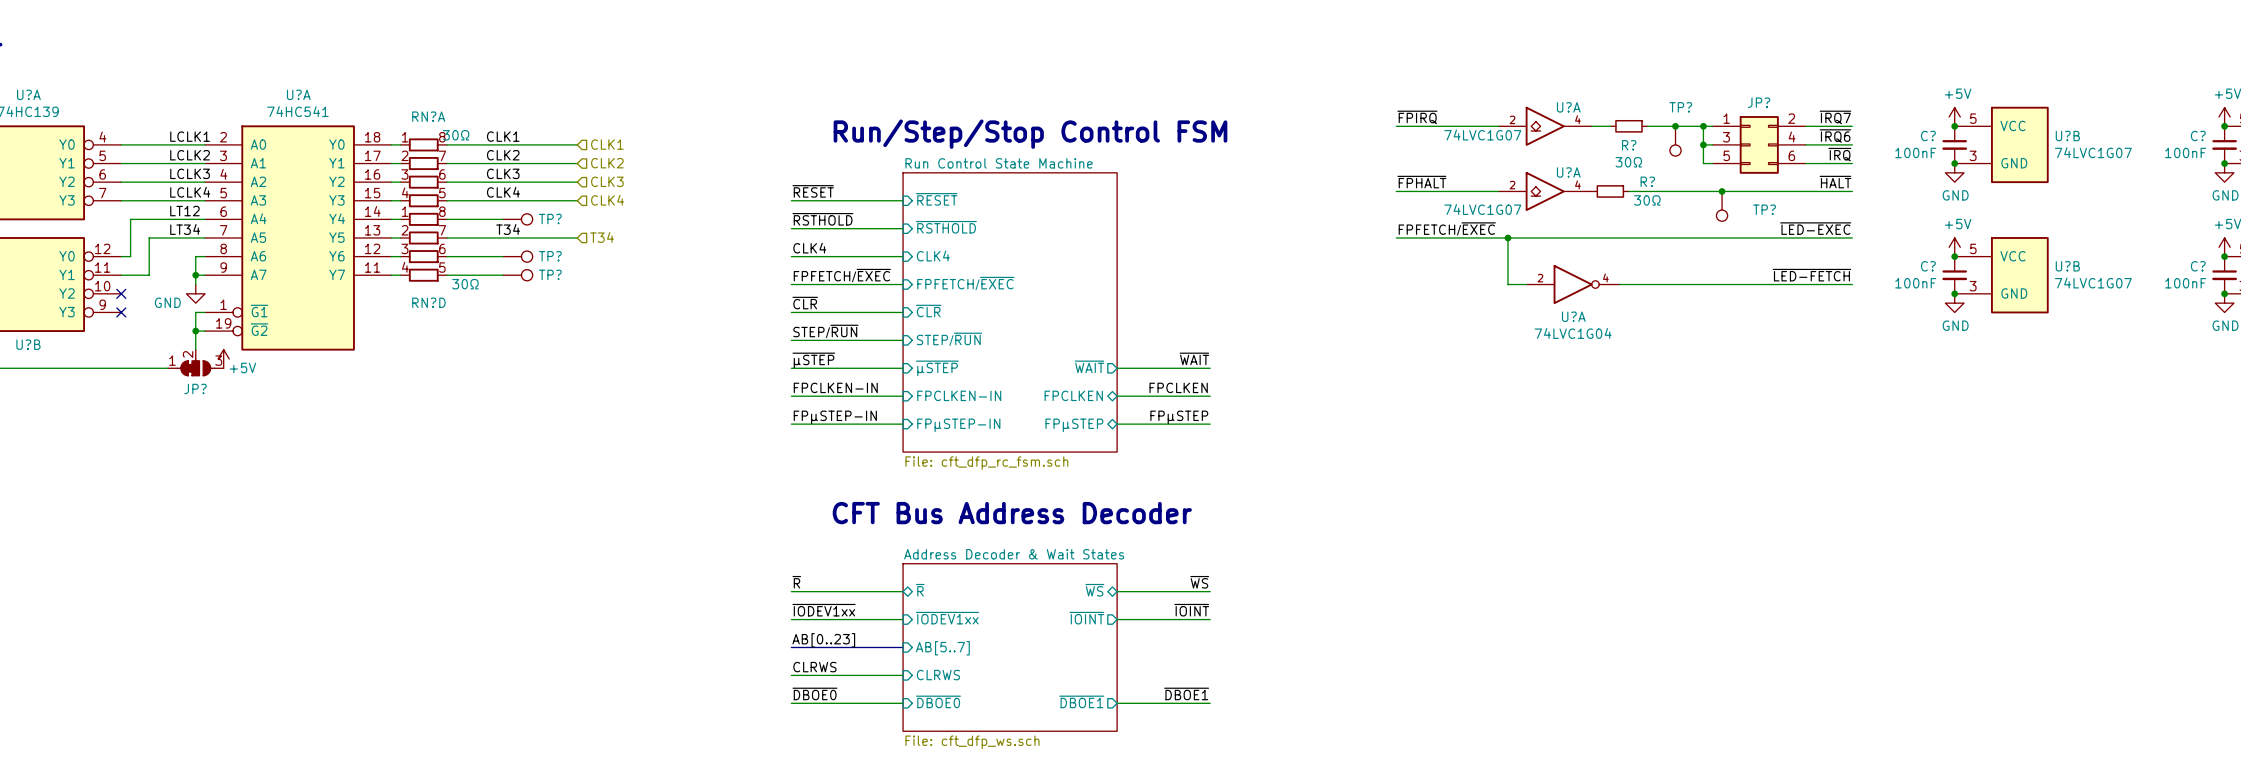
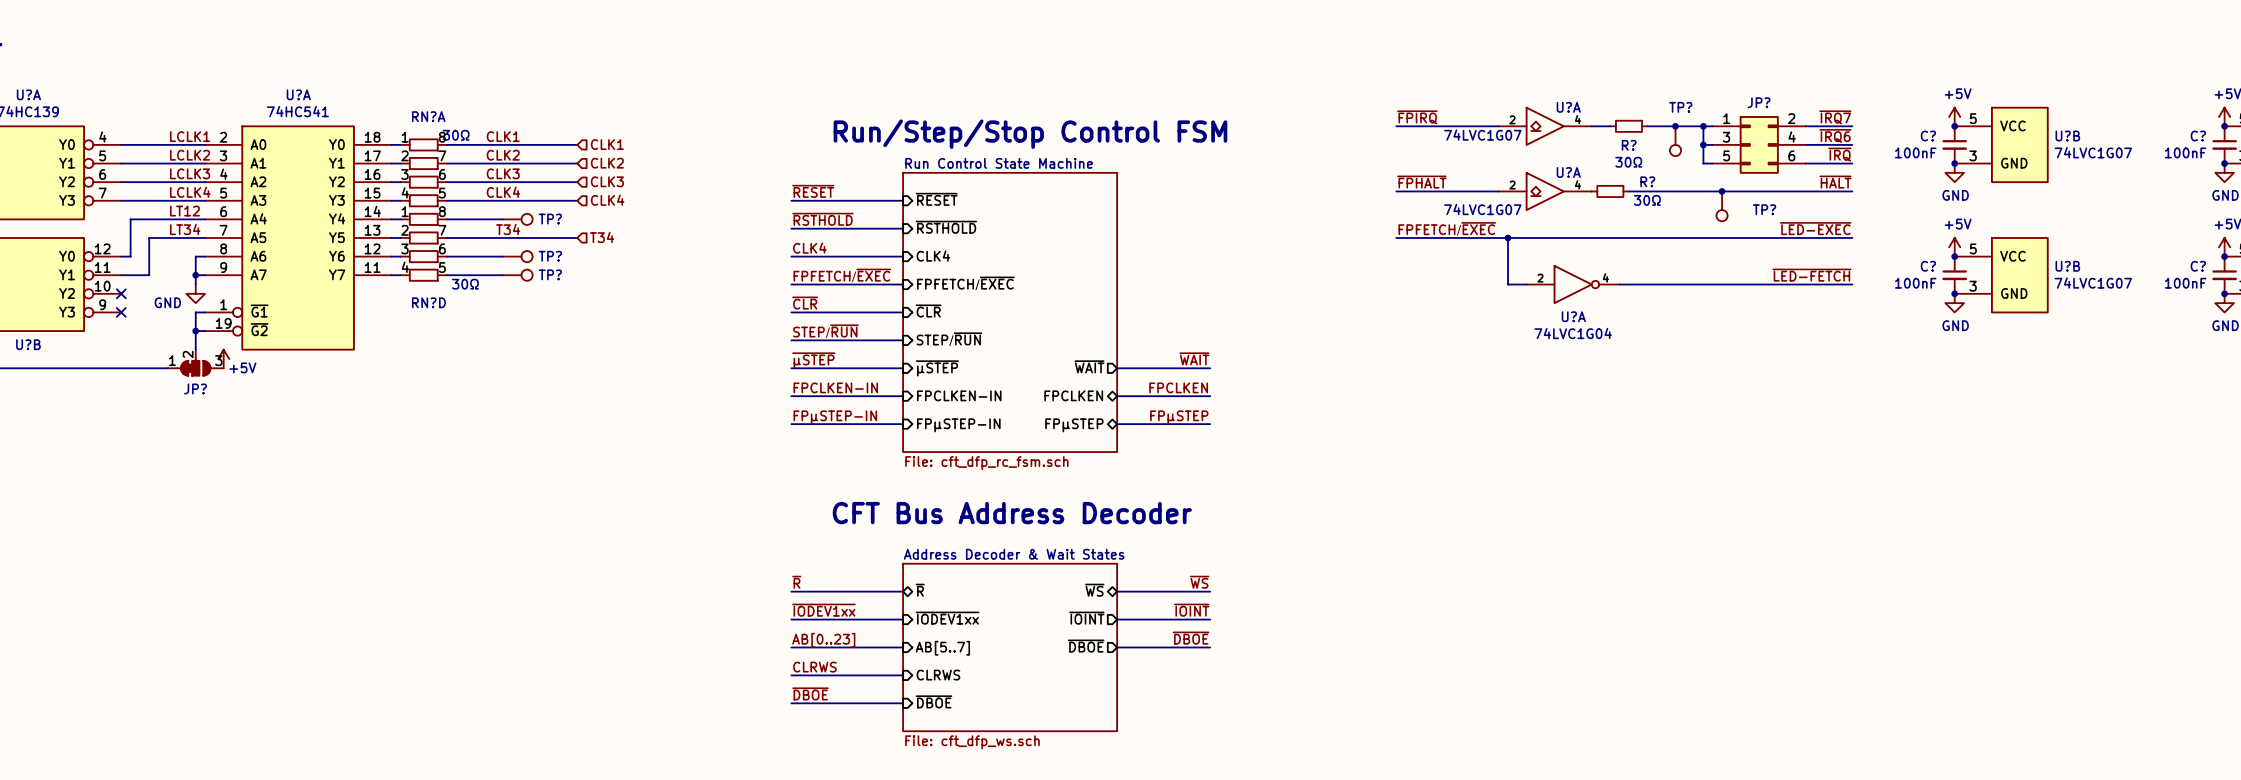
label: none -> ~{DBOE} (1191, 638)
sheet pin: none -> ~{DBOE} (1086, 646)
label: ~{DBOE0} (814, 693) -> ~{DBOE} (810, 693)
label: ~{DBOE1} (1186, 693) -> none
sheet pin: ~{DBOE0} (938, 701) -> ~{DBOE} (934, 701)
sheet pin: ~{DBOE1} (1081, 701) -> none
wire: (1117, 703) (1210, 703) -> (1117, 647) (1210, 647)

